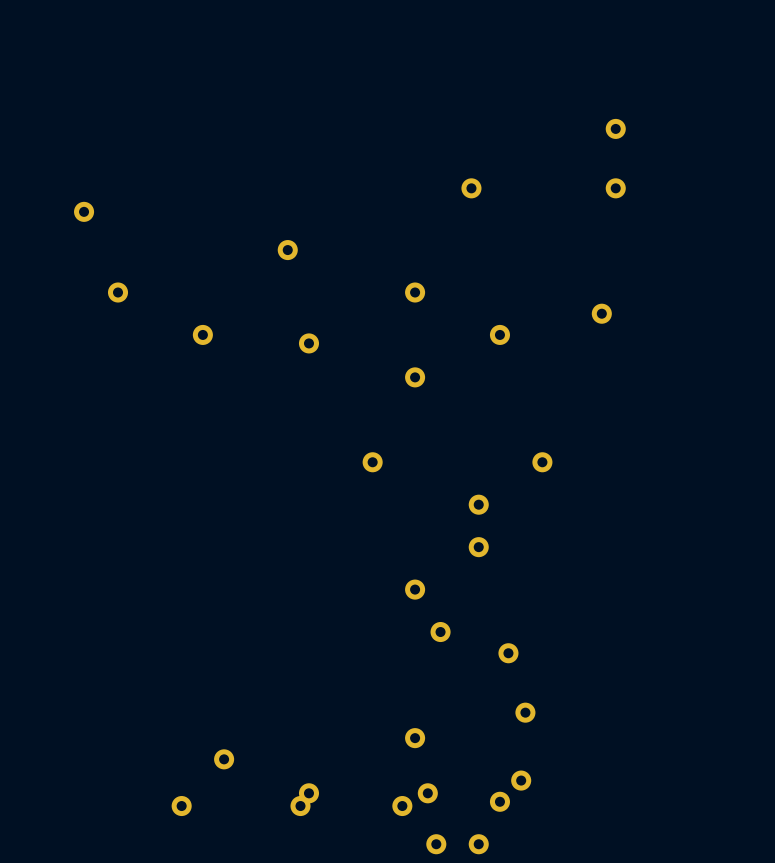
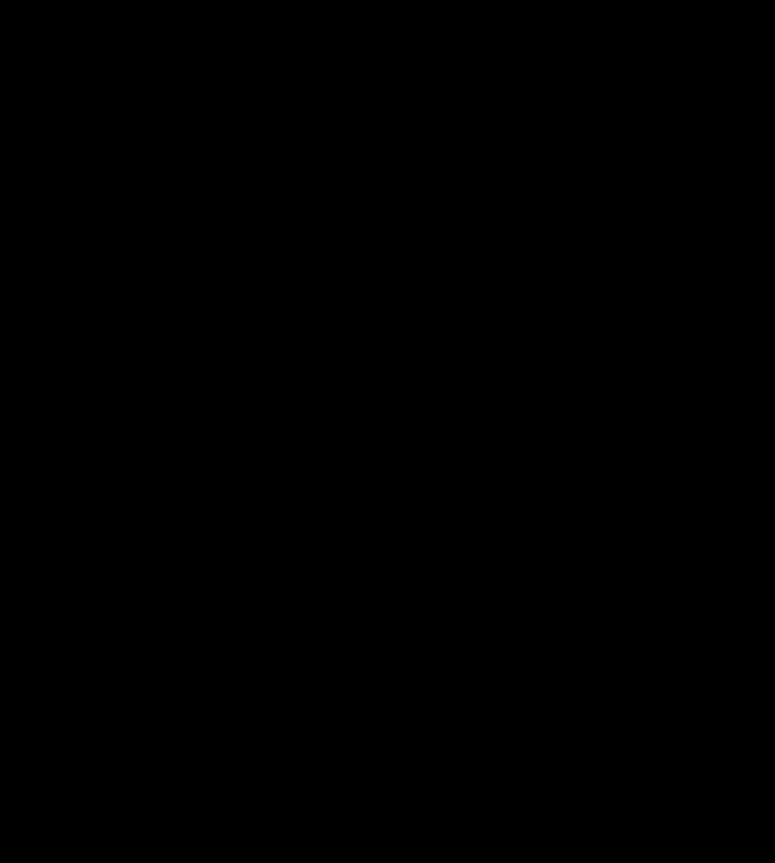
part: (615, 128) -> none
part: (471, 188) -> none
part: (615, 188) -> none
part: (84, 211) -> none
part: (287, 250) -> none
part: (118, 292) -> none
part: (415, 292) -> none
part: (601, 313) -> none
part: (202, 334) -> none
part: (499, 334) -> none
part: (308, 343) -> none
part: (415, 377) -> none
part: (372, 462) -> none
part: (542, 462) -> none
part: (478, 504) -> none
part: (478, 547) -> none
part: (415, 589) -> none
part: (440, 632) -> none
part: (508, 653) -> none
part: (525, 712) -> none
part: (415, 738) -> none
part: (224, 759) -> none
part: (521, 780) -> none
part: (308, 793) -> none
part: (427, 793) -> none
part: (499, 801) -> none
part: (181, 806) -> none
part: (300, 806) -> none
part: (402, 806) -> none
part: (436, 844) -> none
part: (478, 844) -> none

